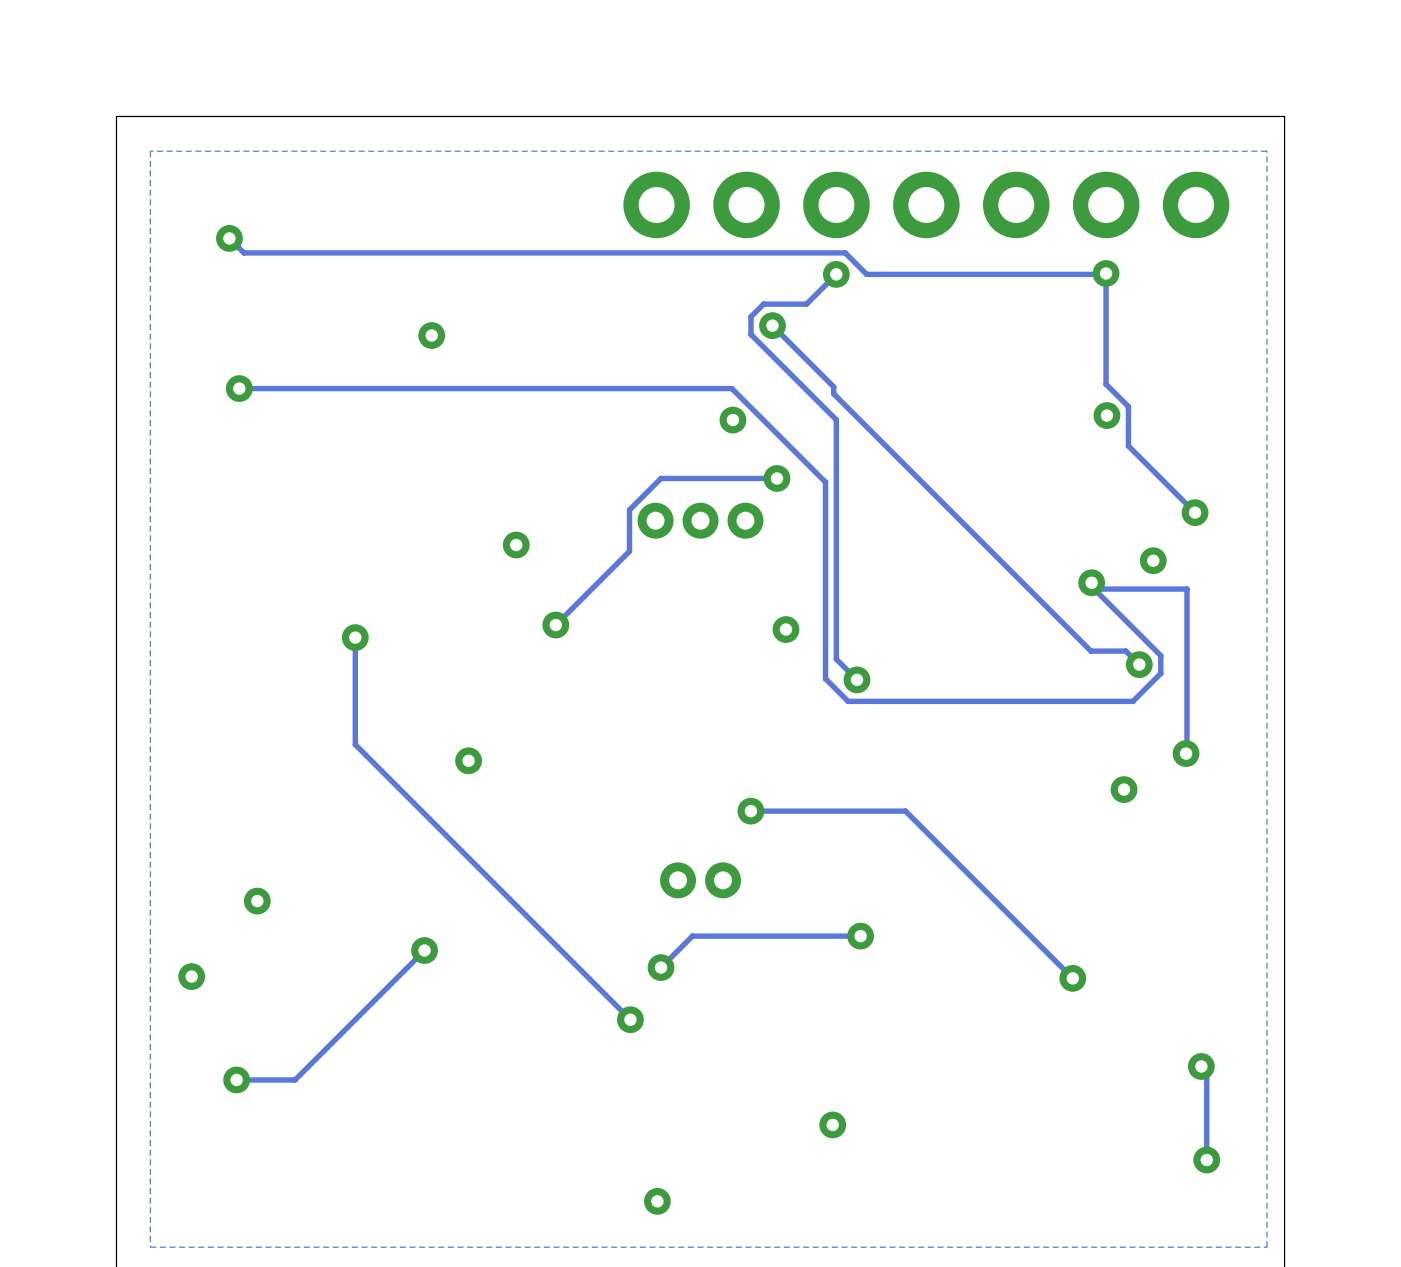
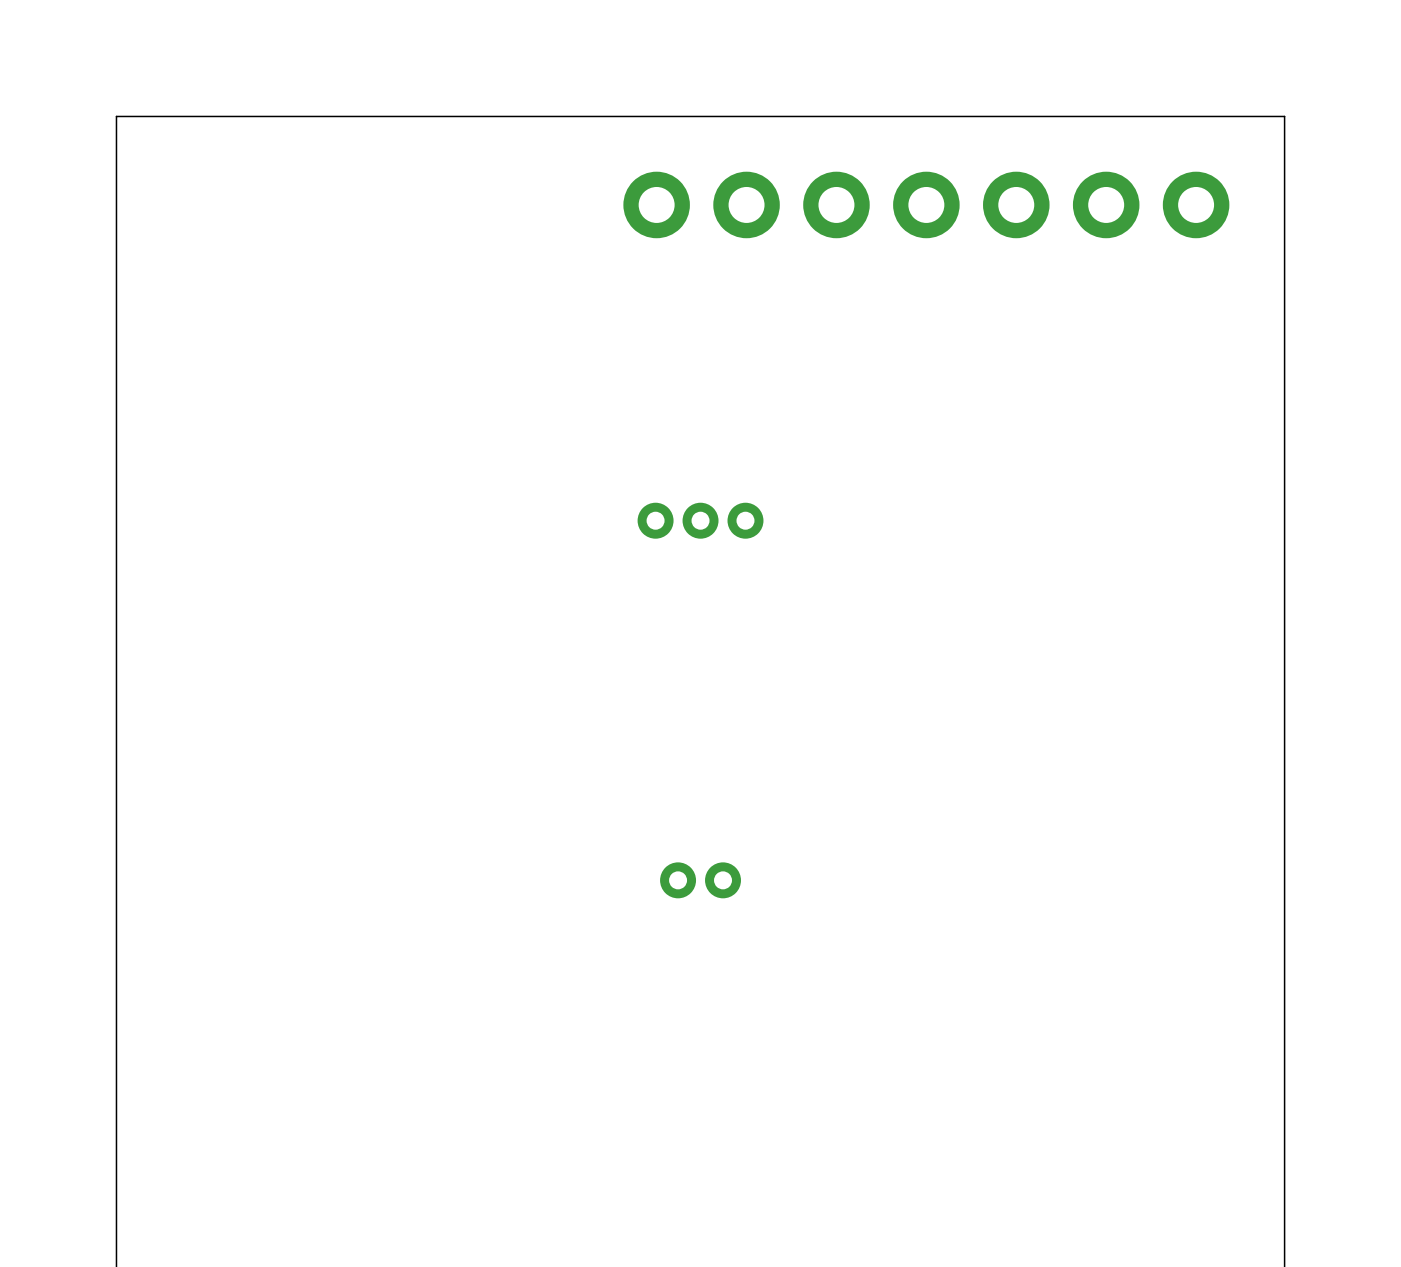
zone outline: (1266, 151) (150, 151) (150, 1247) (1266, 1247) (1266, 151) -> none
track: (229, 238) (243, 252) (845, 252) (866, 274) (1106, 274) -> none
via: (229, 238) -> none
track: (1106, 273) (1106, 384) (1128, 406) (1128, 446) (1195, 512) -> none
via: (1106, 273) -> none
track: (836, 274) (806, 304) (763, 304) (751, 316) (751, 334) (836, 419) (836, 659) (857, 679) -> none
via: (836, 274) -> none
track: (772, 325) (833, 386) (833, 393) (1090, 651) (1125, 651) (1139, 664) -> none
via: (772, 325) -> none
via: (431, 335) -> none
track: (239, 388) (731, 388) (825, 482) (825, 678) (848, 701) (1132, 701) (1160, 673) (1160, 655) (1091, 586) (1091, 582) (1097, 589) (1186, 589) (1186, 753) -> none
via: (239, 388) -> none
via: (1106, 415) -> none
via: (732, 420) -> none
track: (776, 478) (660, 478) (629, 509) (629, 551) (555, 625) -> none
via: (776, 478) -> none
via: (1195, 512) -> none
via: (516, 545) -> none
via: (1153, 560) -> none
via: (1091, 582) -> none
via: (555, 625) -> none
via: (785, 629) -> none
track: (355, 637) (355, 744) (630, 1019) -> none
via: (355, 637) -> none
via: (1139, 664) -> none
via: (857, 679) -> none
via: (1186, 753) -> none
via: (468, 760) -> none
via: (1124, 789) -> none
track: (750, 811) (905, 811) (1072, 978) -> none
via: (750, 811) -> none
via: (257, 901) -> none
track: (860, 936) (692, 936) (661, 967) -> none
via: (860, 936) -> none
track: (424, 950) (295, 1079) (236, 1079) -> none
via: (424, 950) -> none
via: (661, 967) -> none
via: (191, 976) -> none
via: (1072, 978) -> none
via: (630, 1019) -> none
track: (1201, 1066) (1206, 1071) (1206, 1160) -> none
via: (1201, 1066) -> none
via: (236, 1079) -> none
via: (832, 1124) -> none
via: (1206, 1160) -> none
via: (657, 1201) -> none

